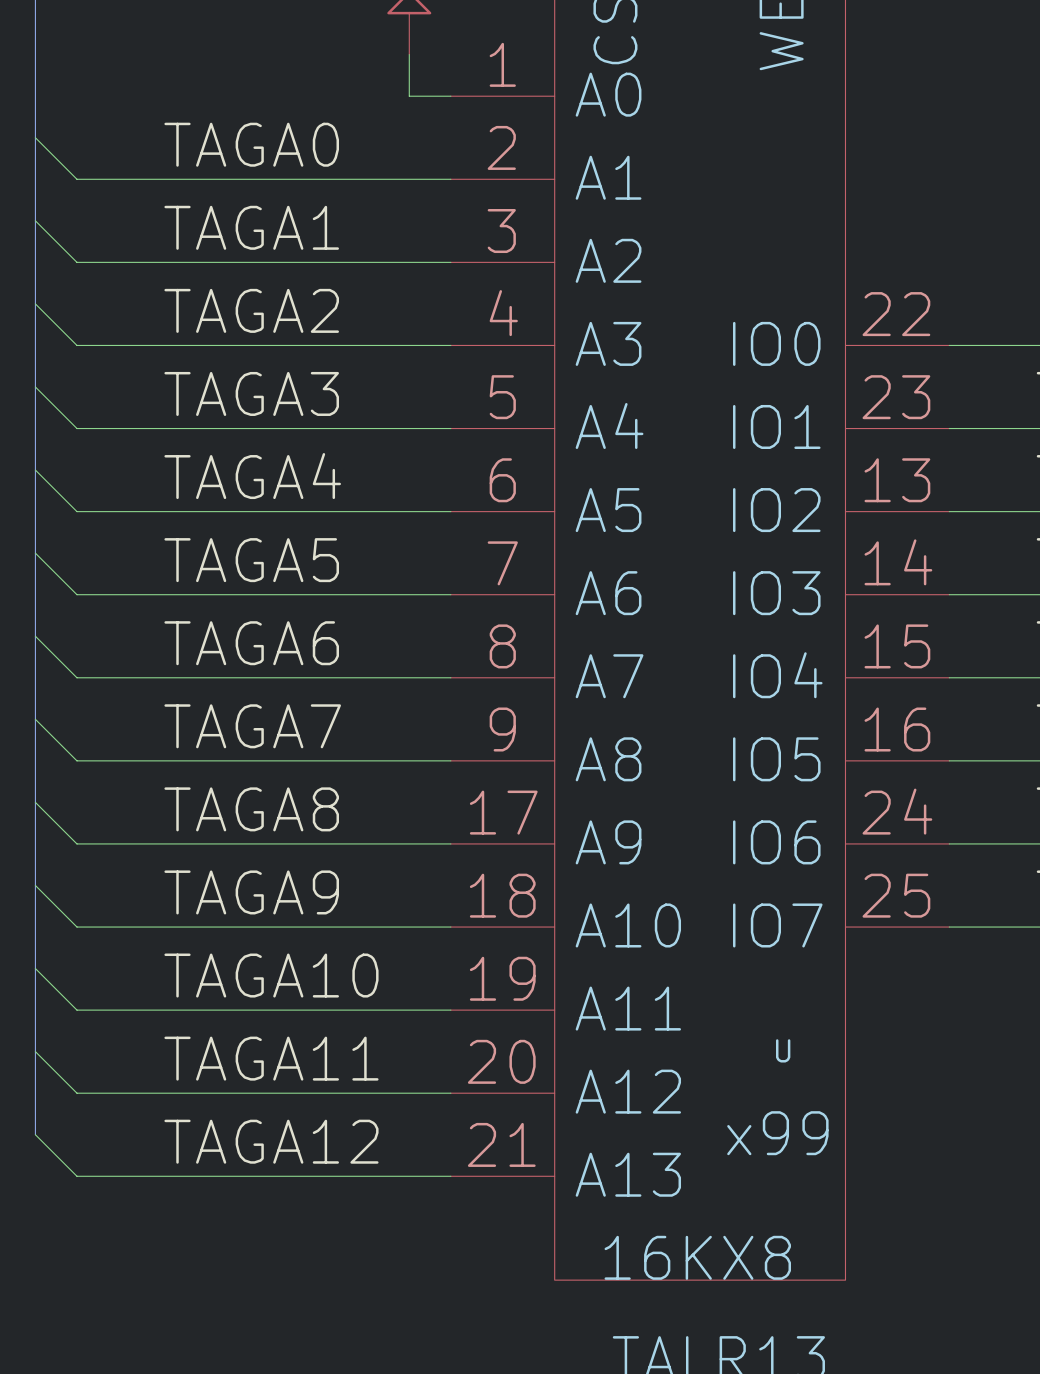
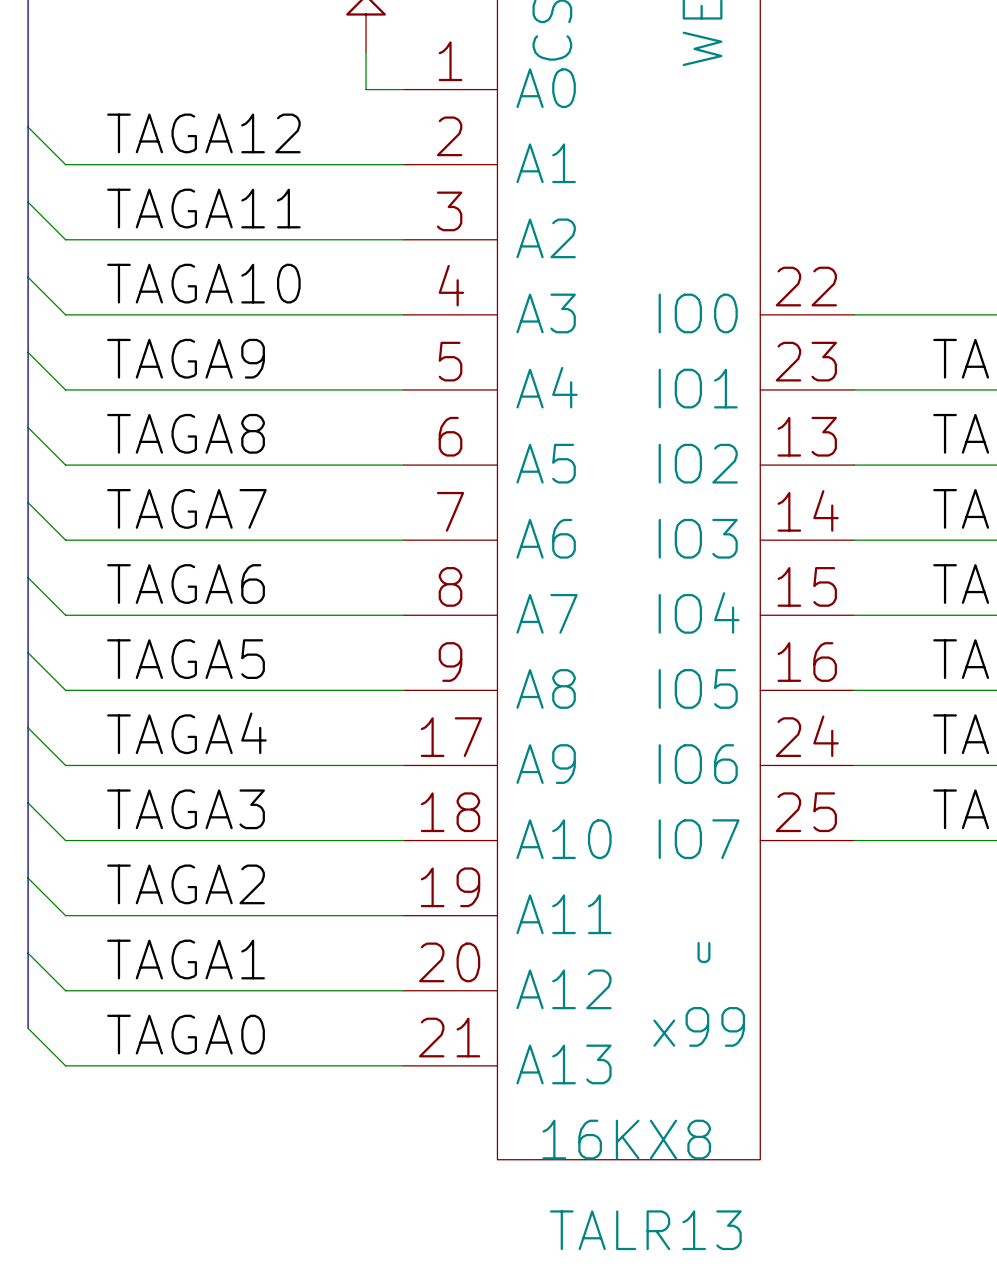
label: TAGA0 (251, 144) -> TAGA12 (203, 133)
label: TAGA1 (251, 227) -> TAGA11 (203, 208)
label: TAGA2 (251, 310) -> TAGA10 (203, 283)
label: TAGA3 (251, 393) -> TAGA9 (186, 358)
label position: TAGA4 (252, 476) -> TAGA4 (186, 733)
label position: TAGA5 (251, 560) -> TAGA5 (186, 659)
label position: TAGA6 (251, 643) -> TAGA6 (186, 584)
label position: TAGA7 (252, 726) -> TAGA7 (186, 508)
label position: TAGA8 (251, 809) -> TAGA8 (186, 433)
label: TAGA9 (251, 892) -> TAGA3 (186, 809)
label: TAGA10 (271, 975) -> TAGA2 (186, 884)
label: TAGA11 (271, 1058) -> TAGA1 (186, 959)
label: TAGA12 (271, 1141) -> TAGA0 (186, 1034)

